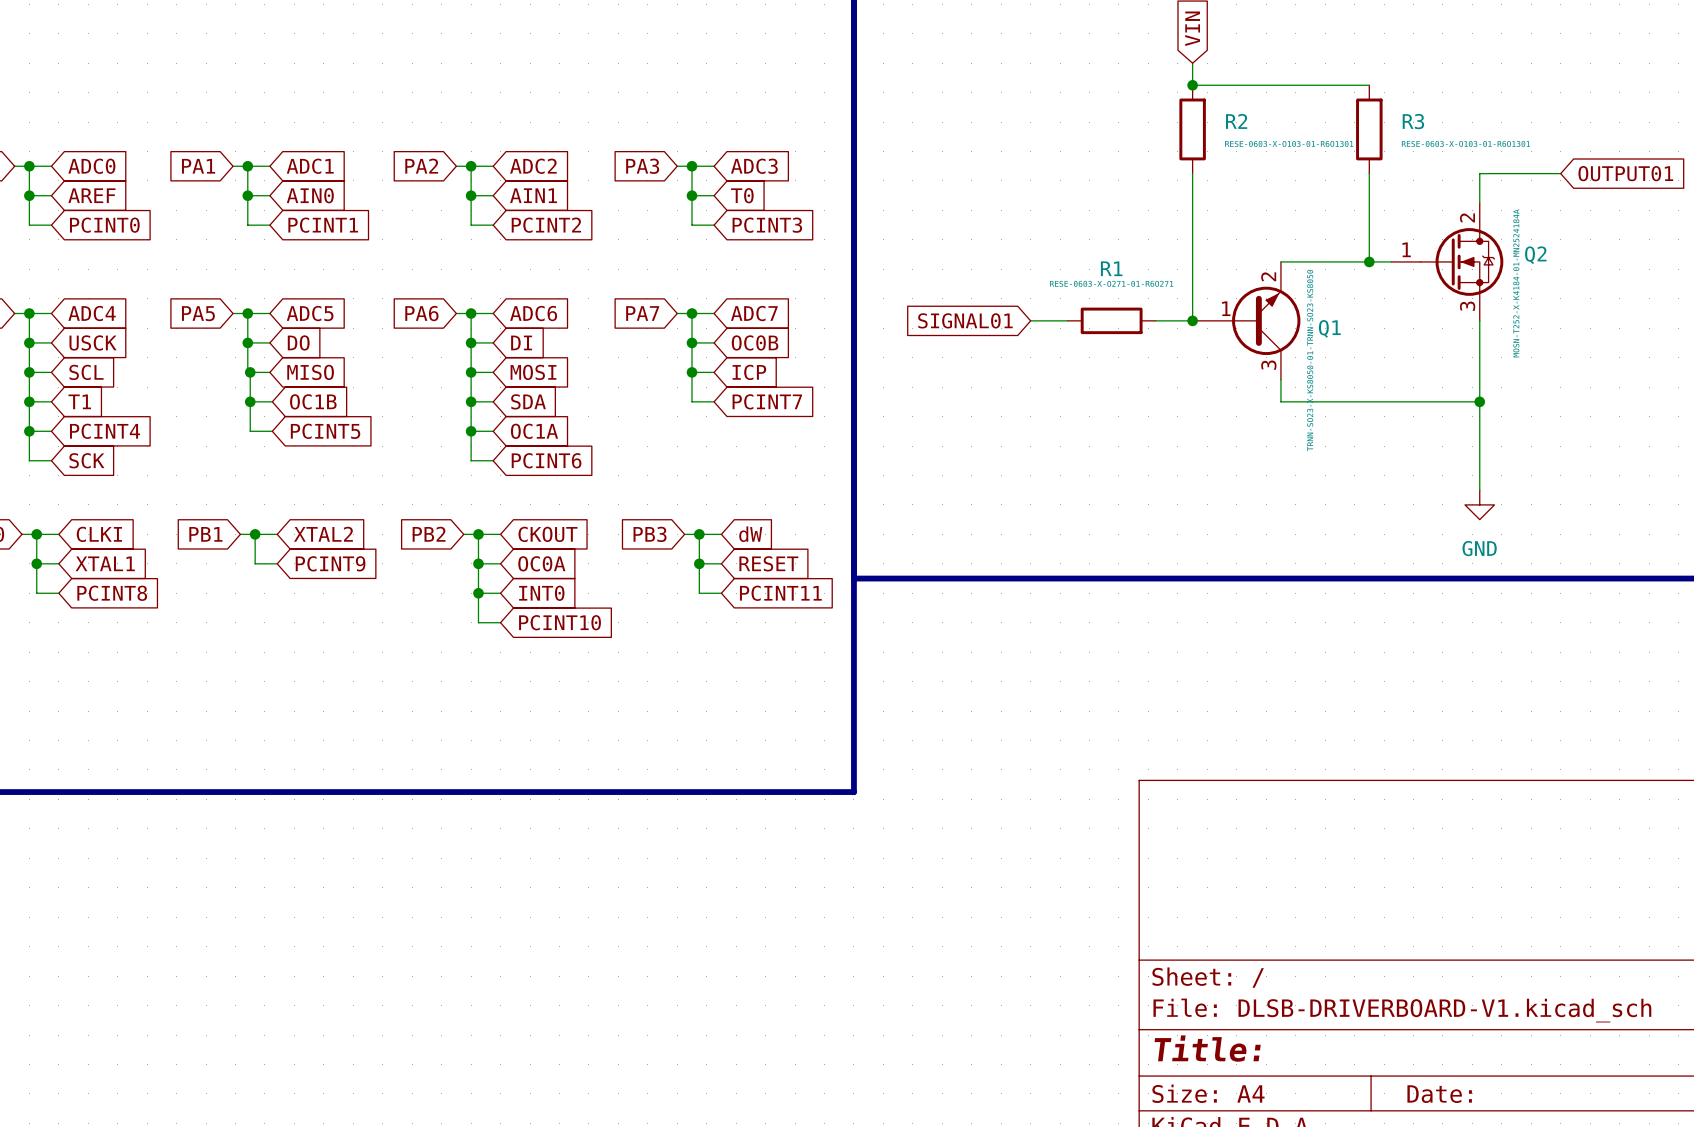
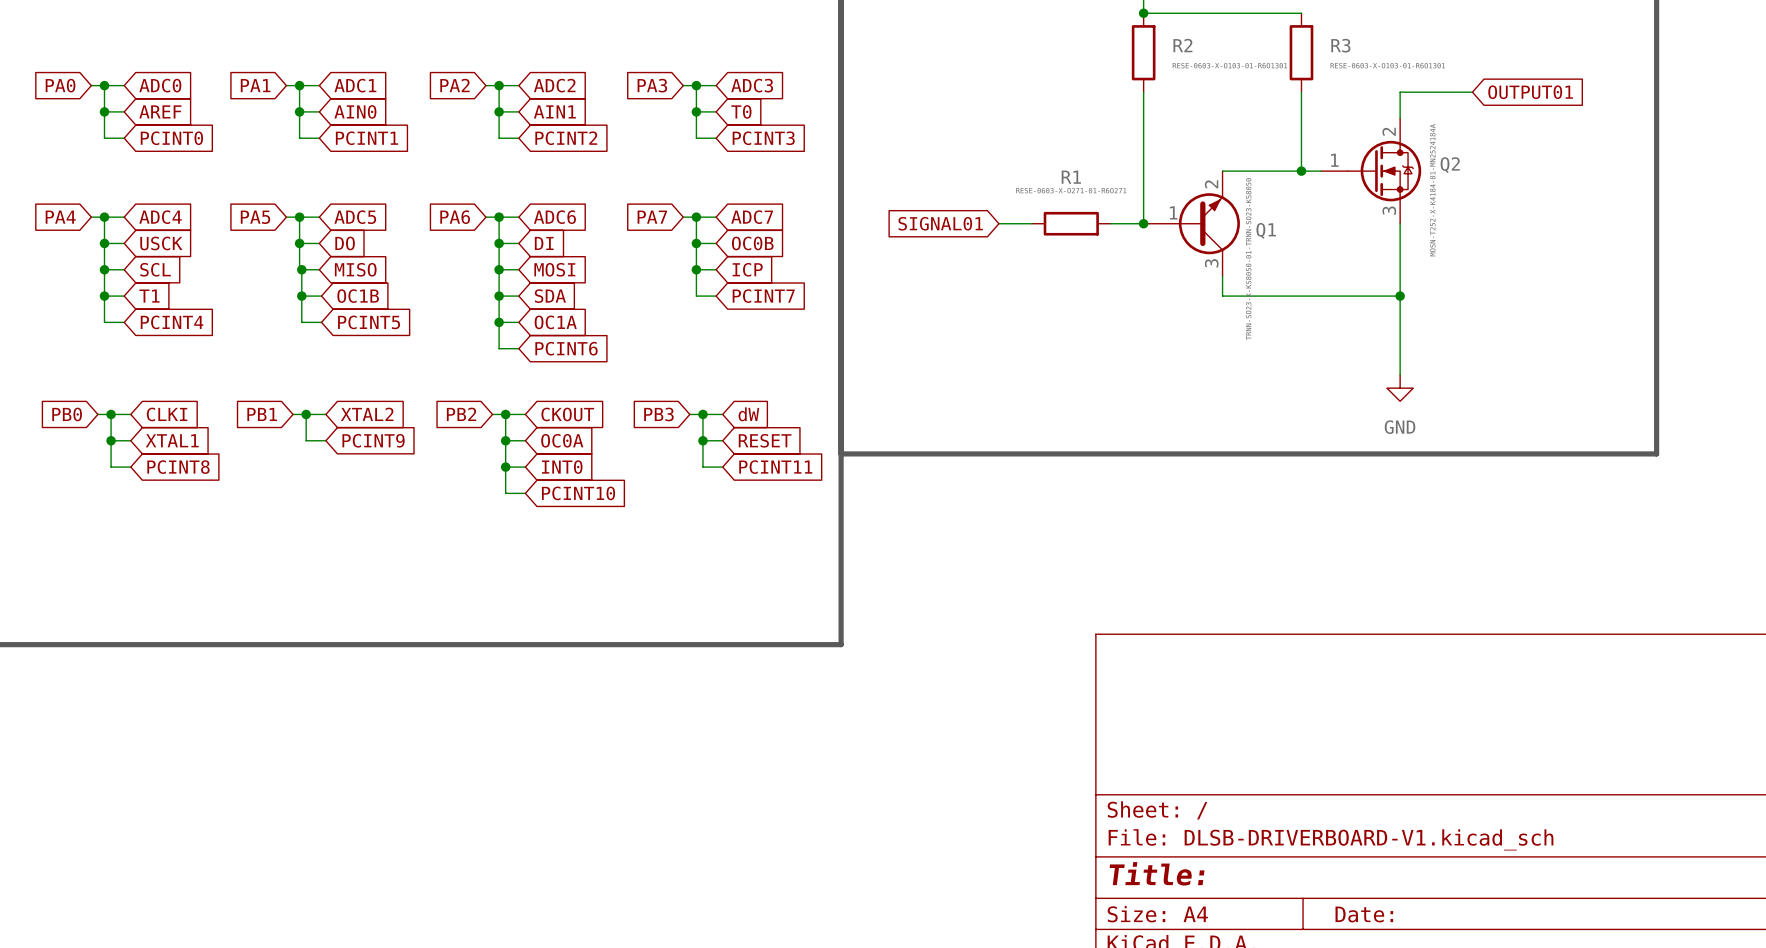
wire: (29, 431) (29, 460) (51, 460) -> none
junction: (29, 431) -> none
global label: SCK (86, 460) -> none

